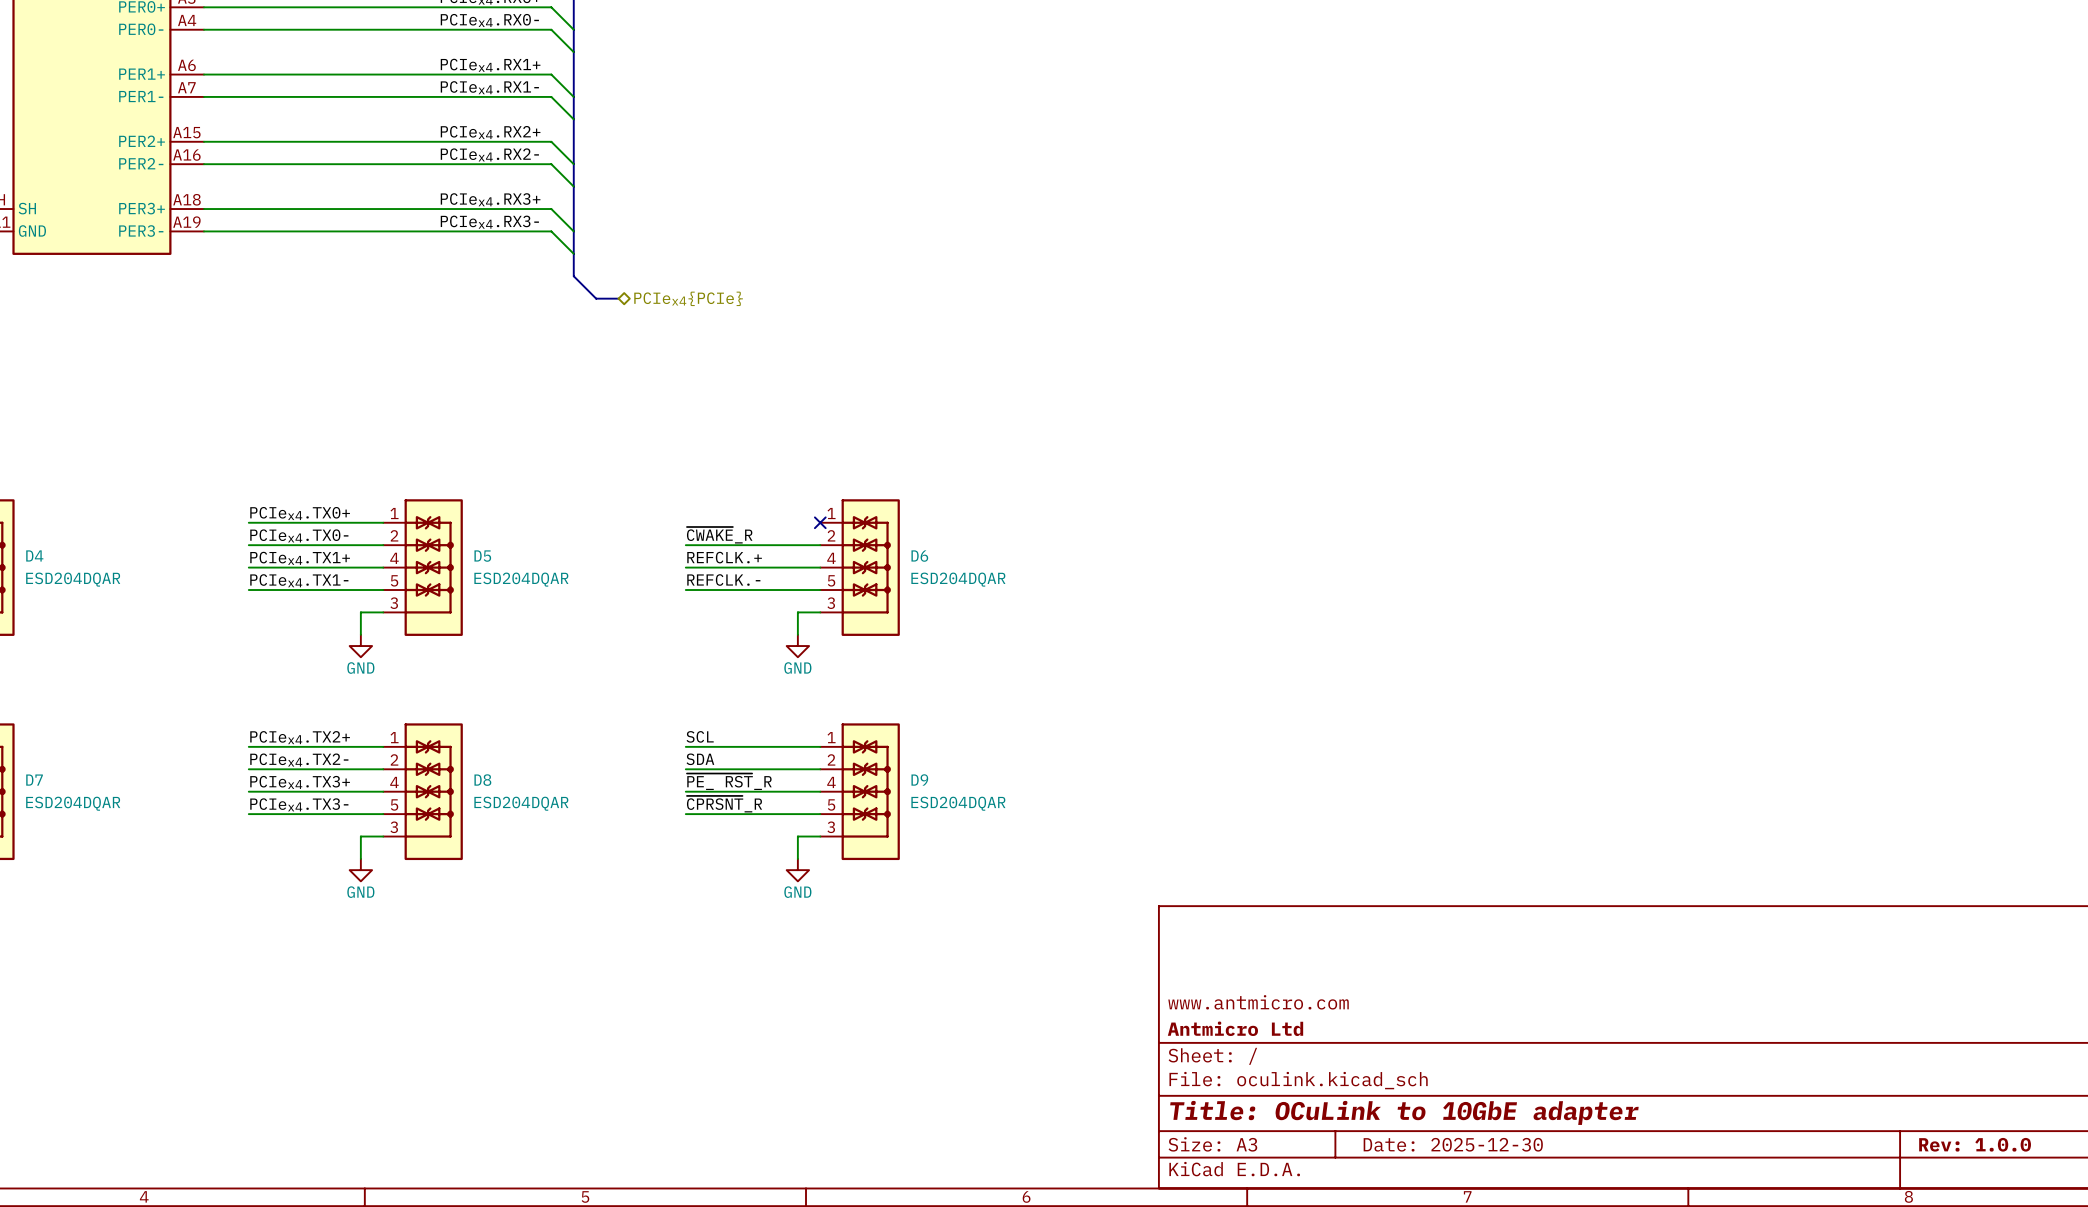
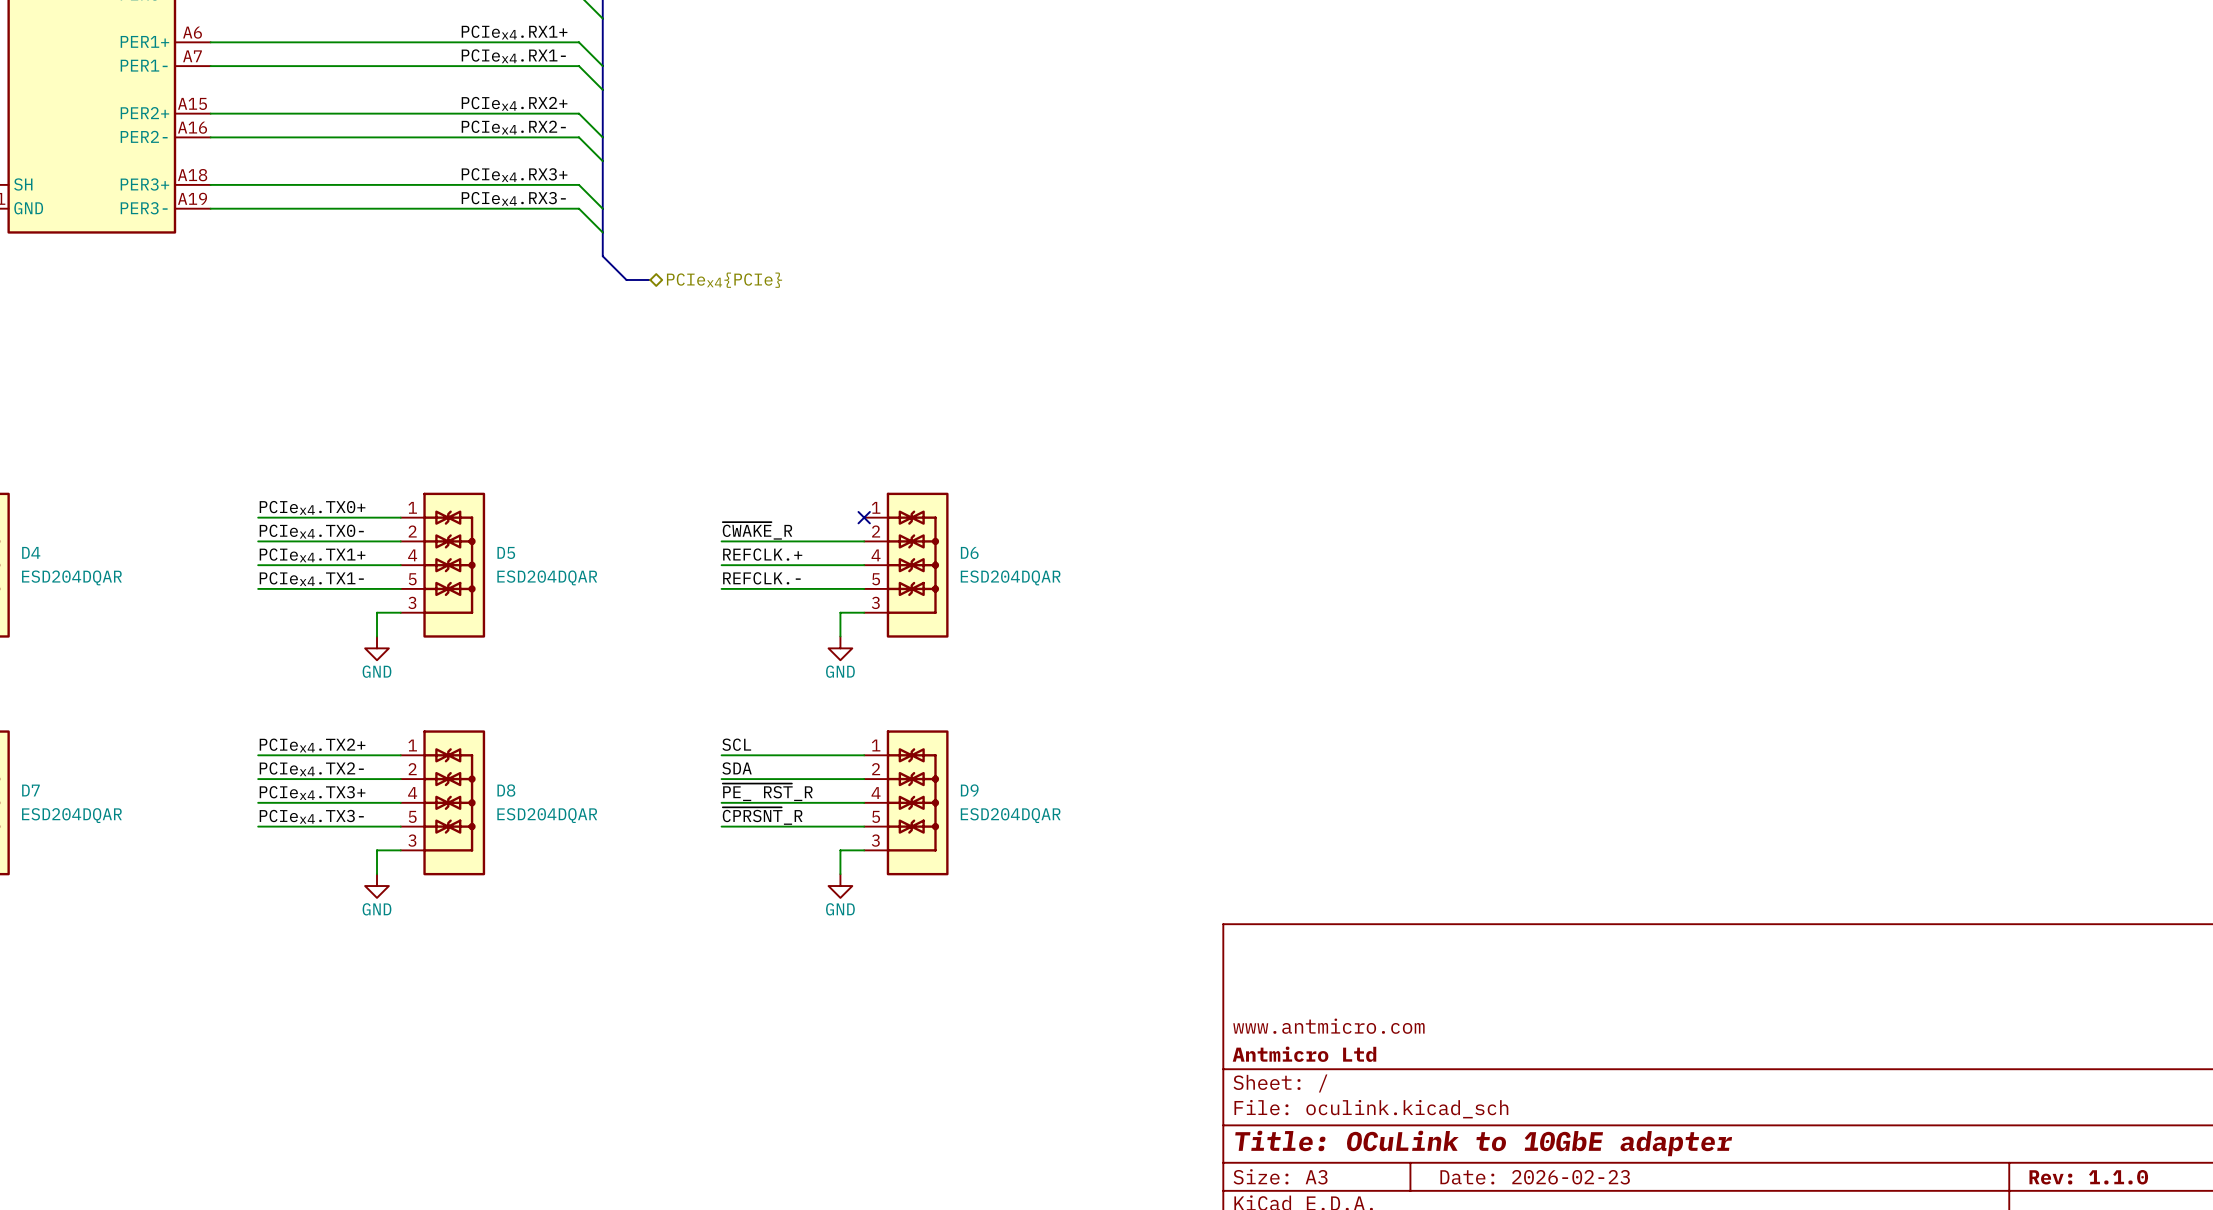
title block: Date: 2025-12-30 (1453, 1144) -> Date: 2026-02-23 (1535, 1177)
title block: Rev: 1.0.0 (1975, 1144) -> Rev: 1.1.0 (2088, 1177)

